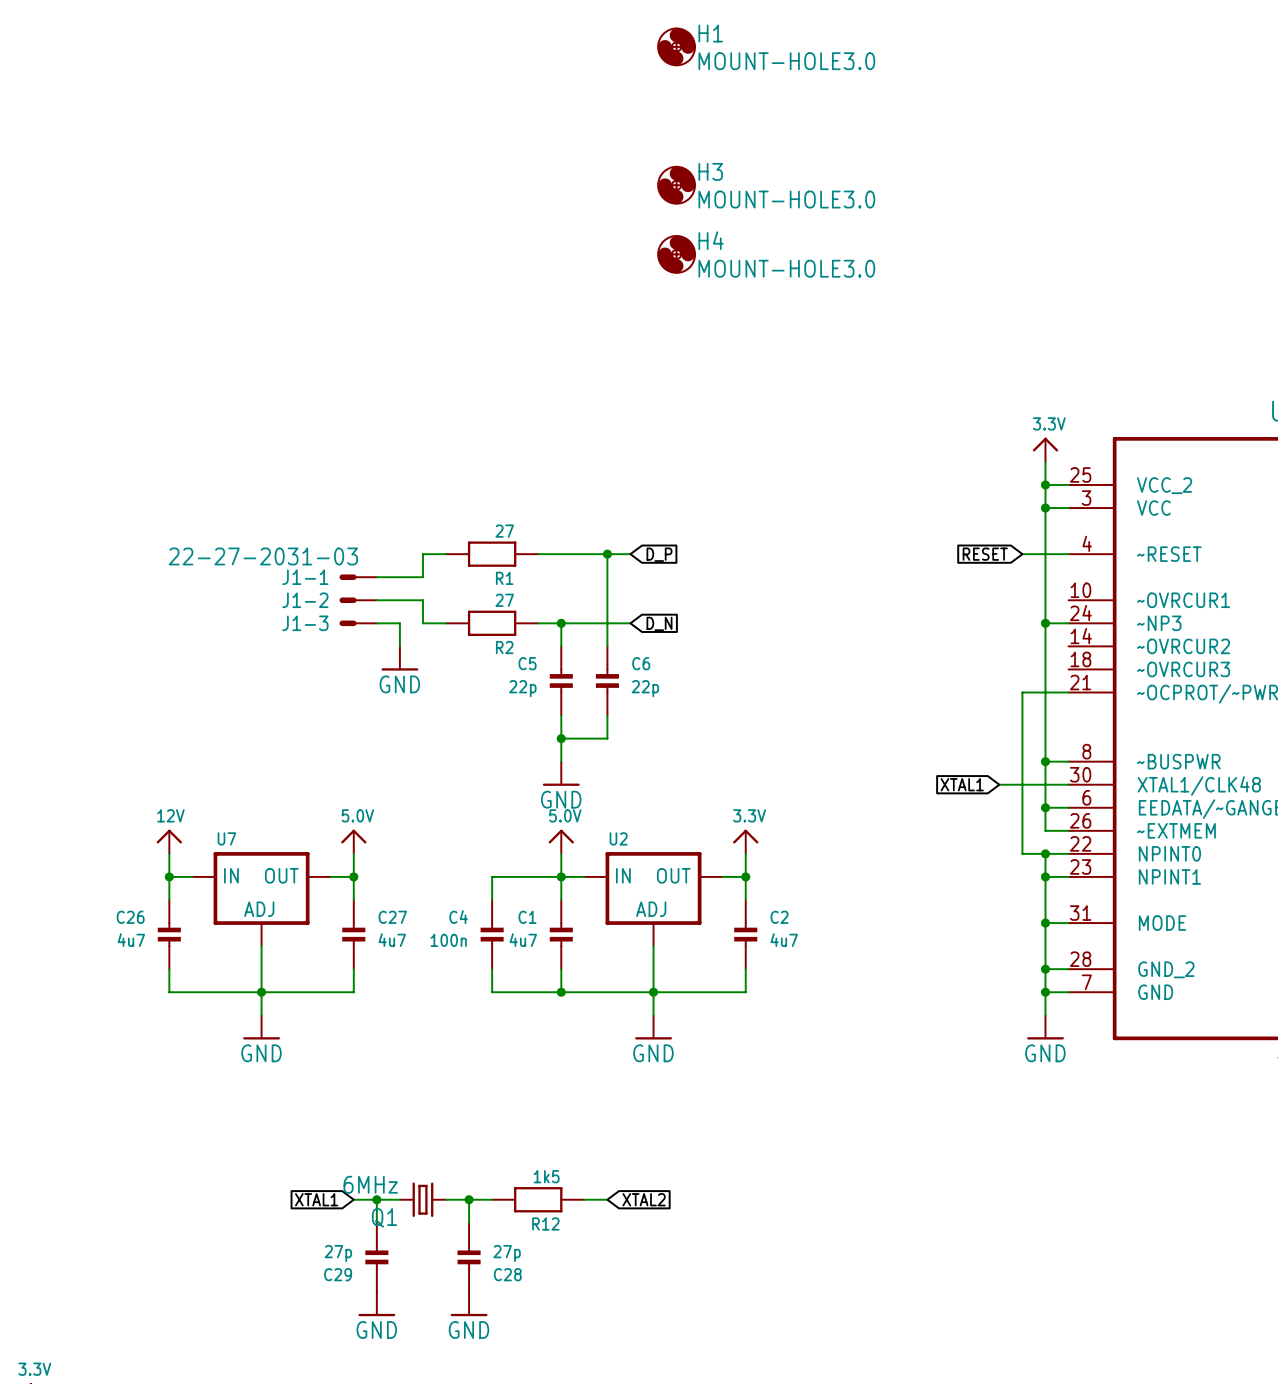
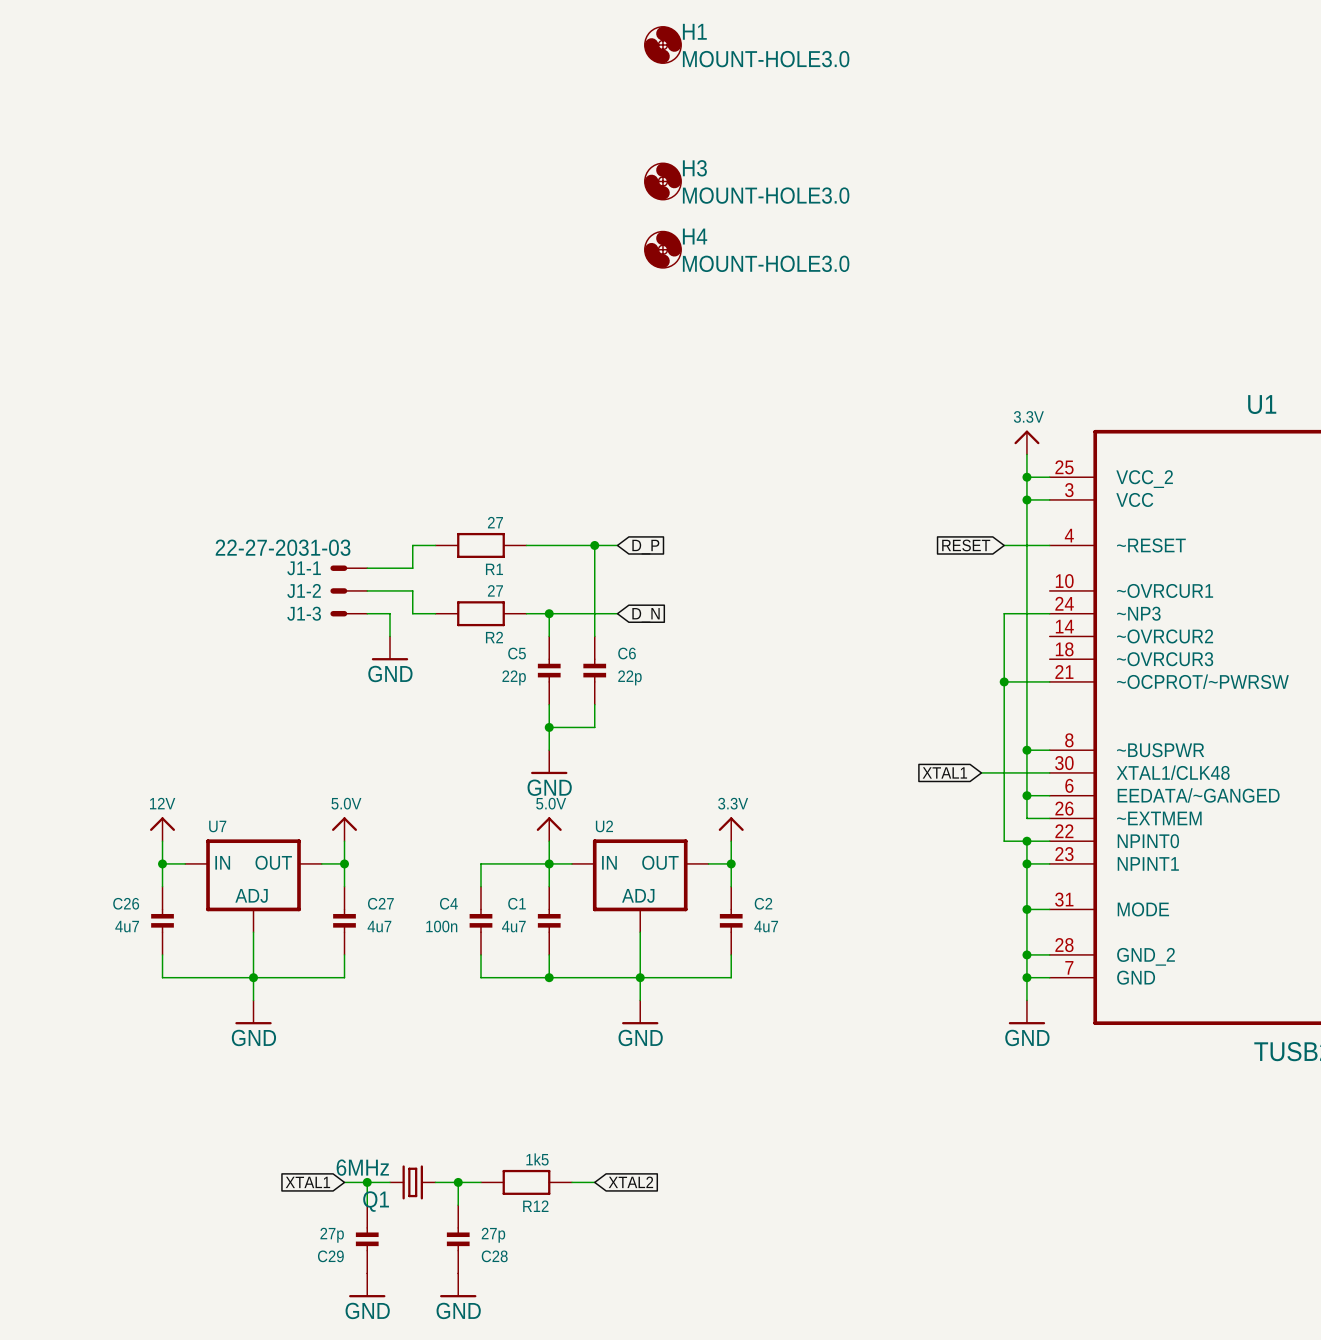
wire: none -> (1026, 613) (1004, 613) (1004, 681)
junction: (1045, 623) -> none
junction: none -> (1004, 681)

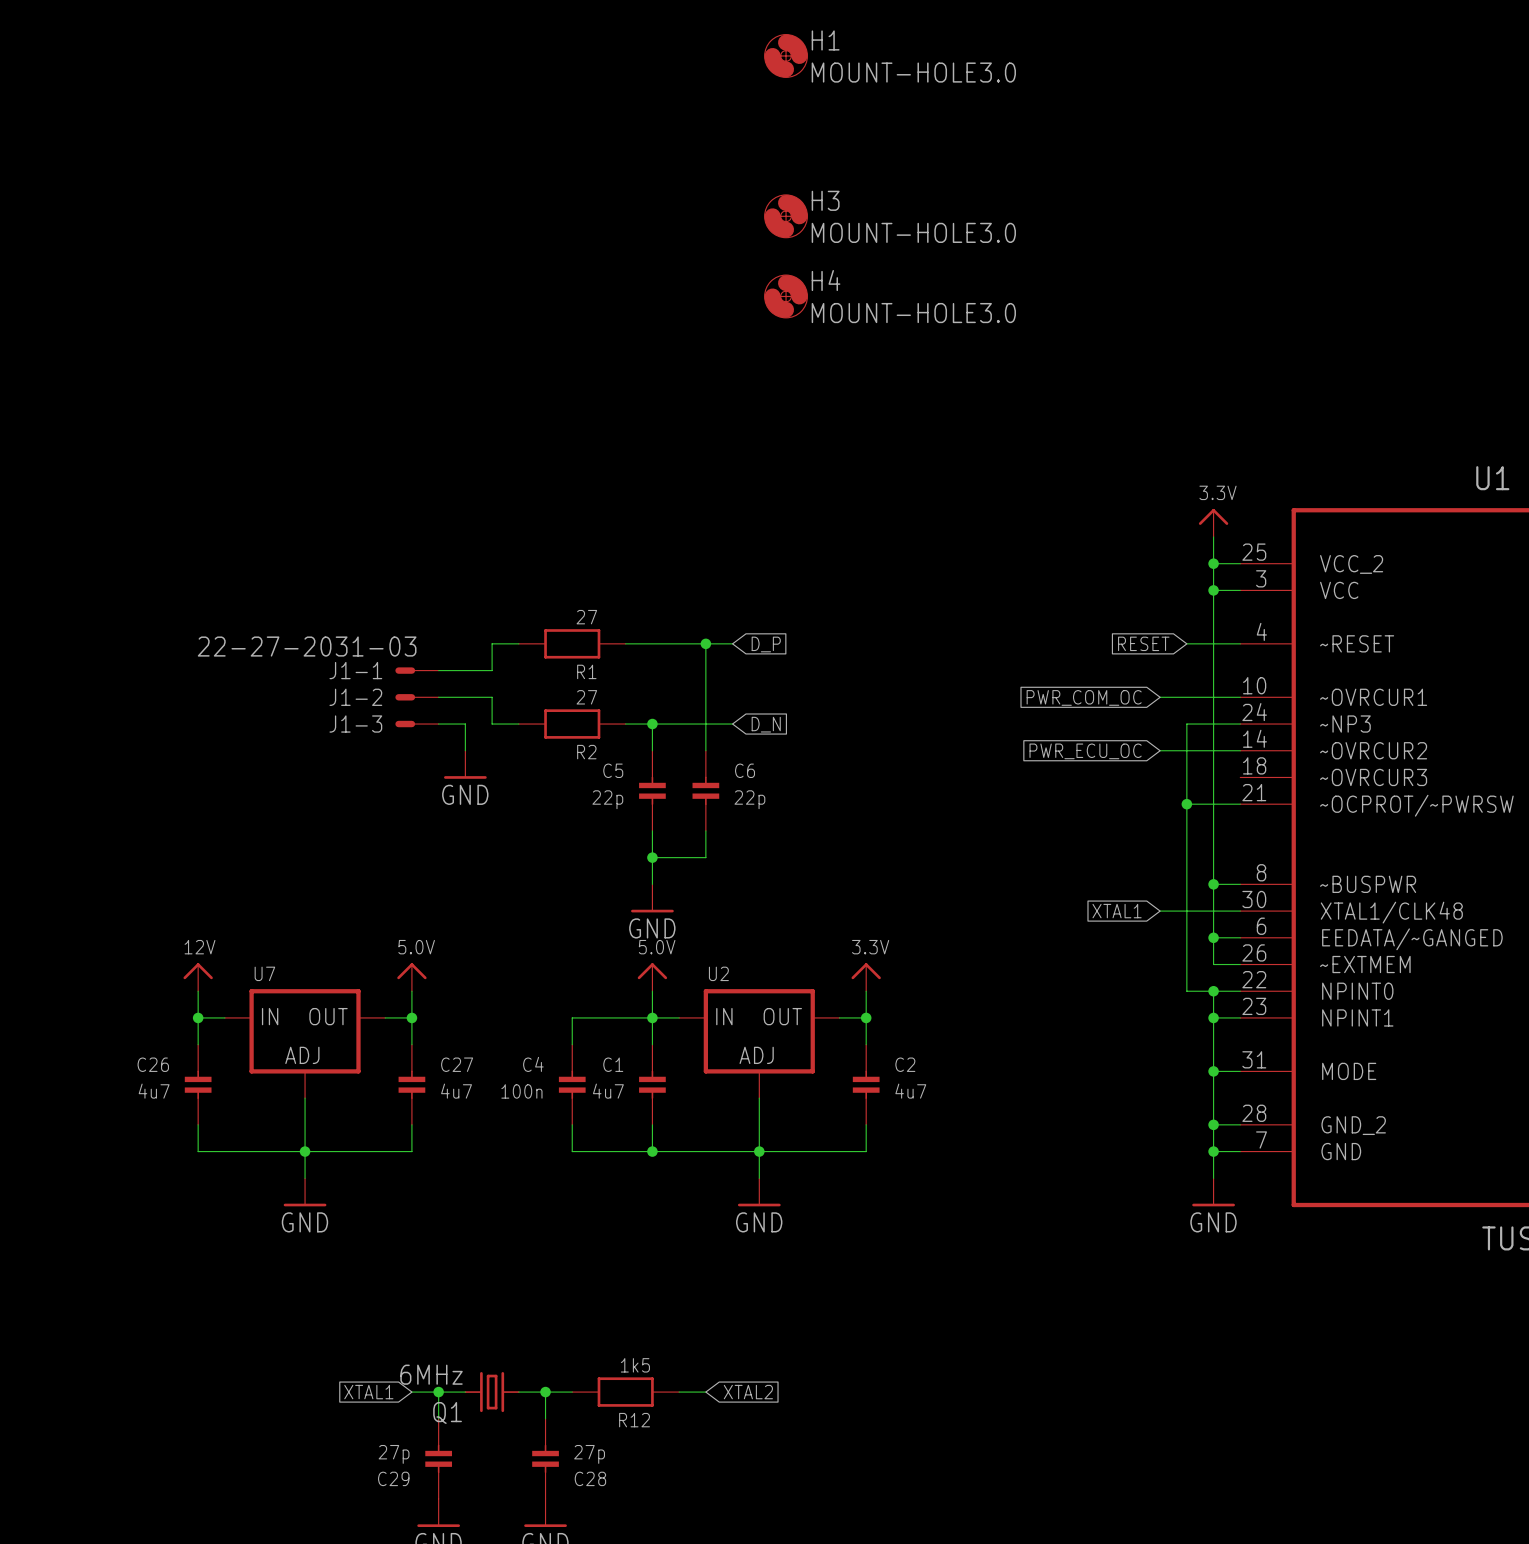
wire: none -> (1160, 697) (1240, 697)
global label: none -> PWR_COM_OC (1084, 697)
wire: none -> (1160, 750) (1240, 750)
global label: none -> PWR_ECU_OC (1085, 751)

